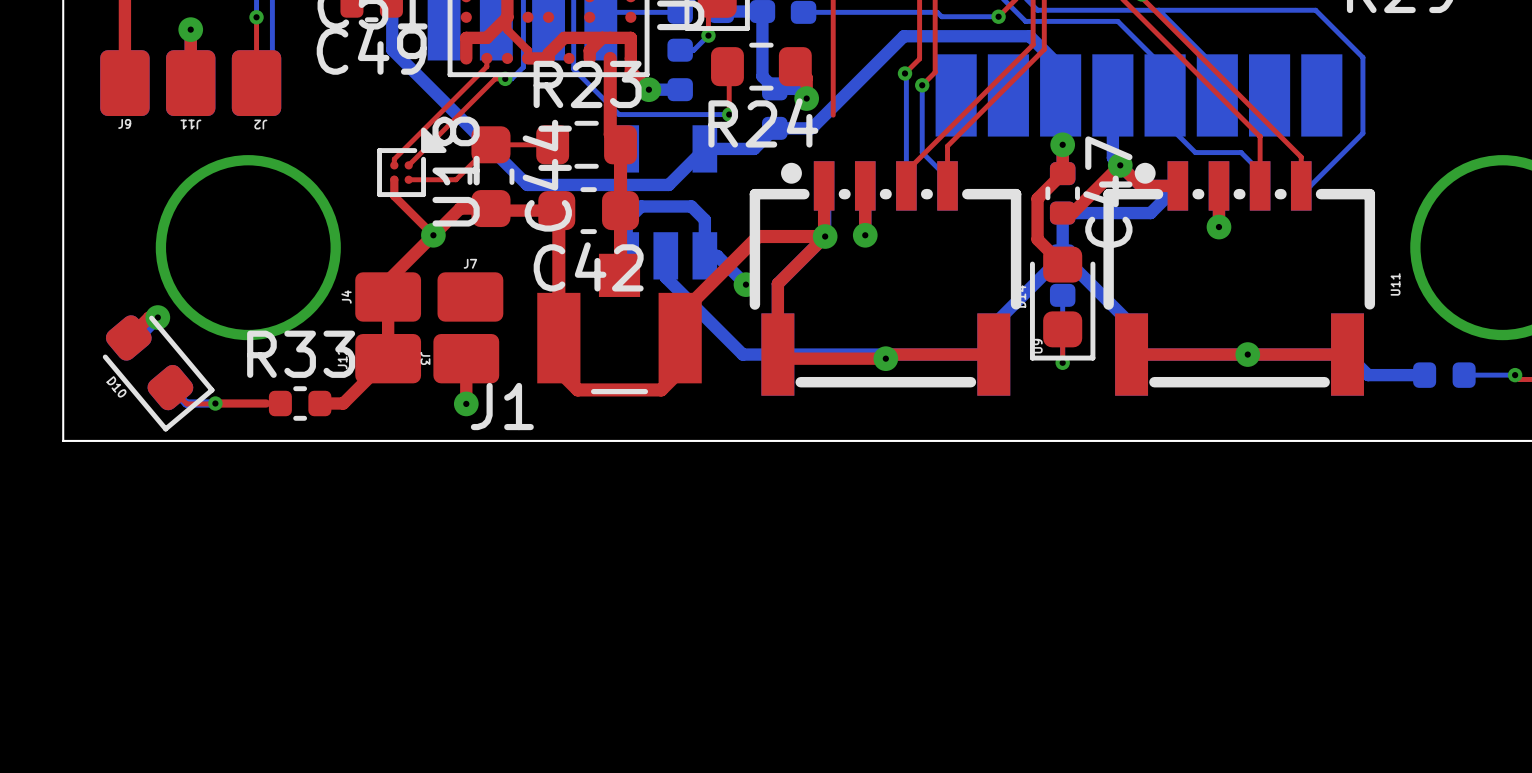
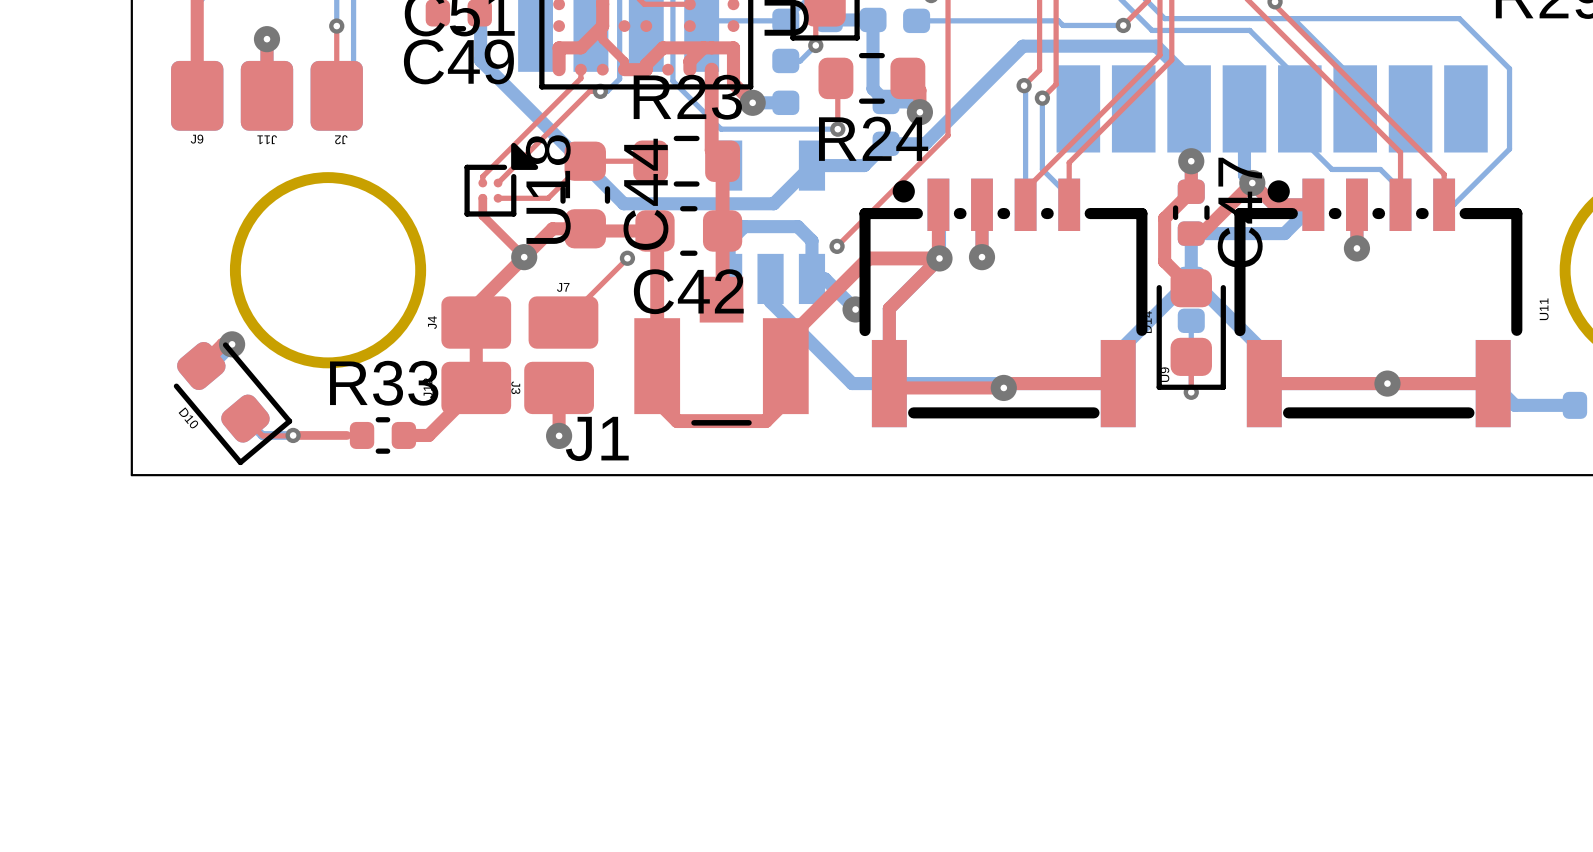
top track: none -> (948, 129) (948, 135) (837, 246)
via: none -> (837, 246)
top track: none -> (627, 258) (563, 322)
via: none -> (627, 258)

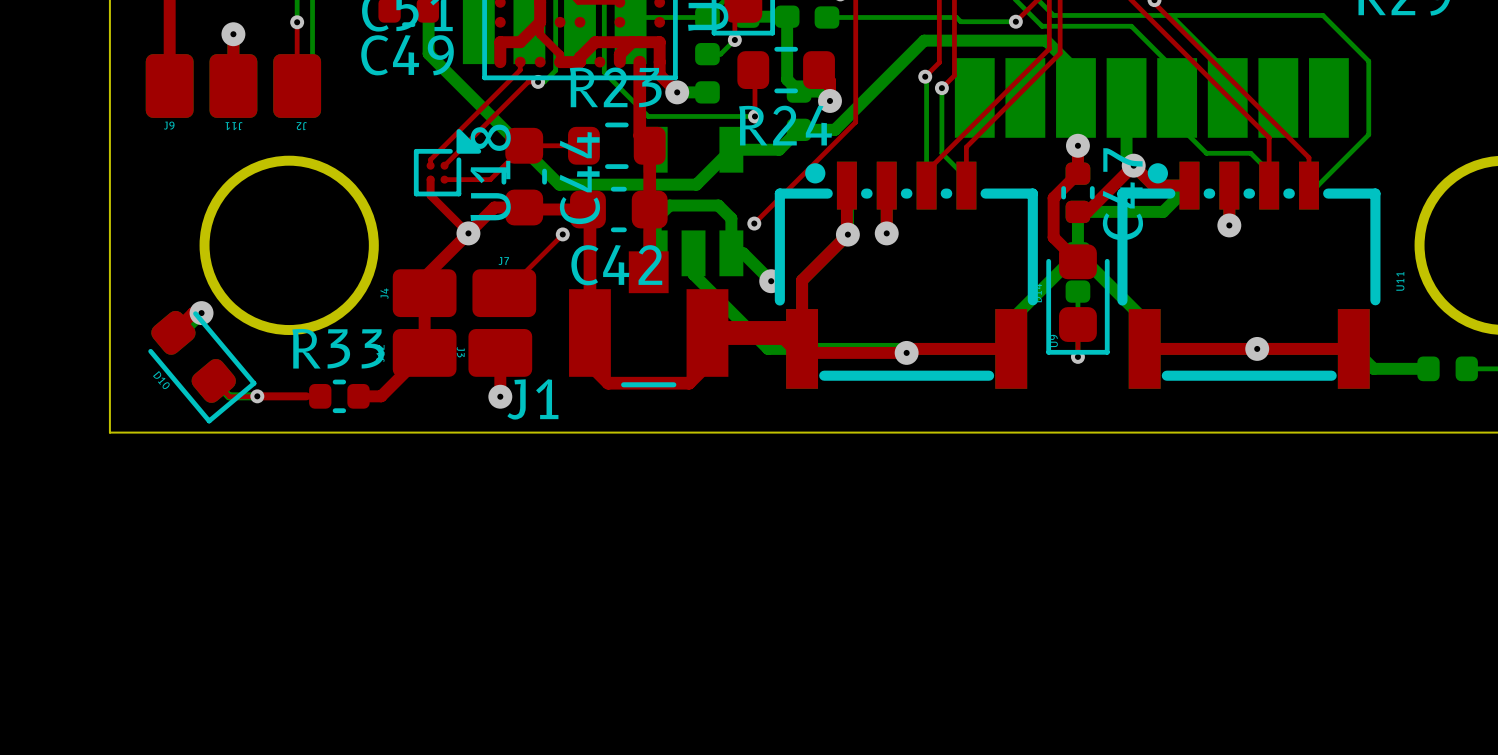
top track: (939, 258) (868, 258) (785, 341) -> none
top track: none -> (707, 332) (786, 332) (802, 348)

